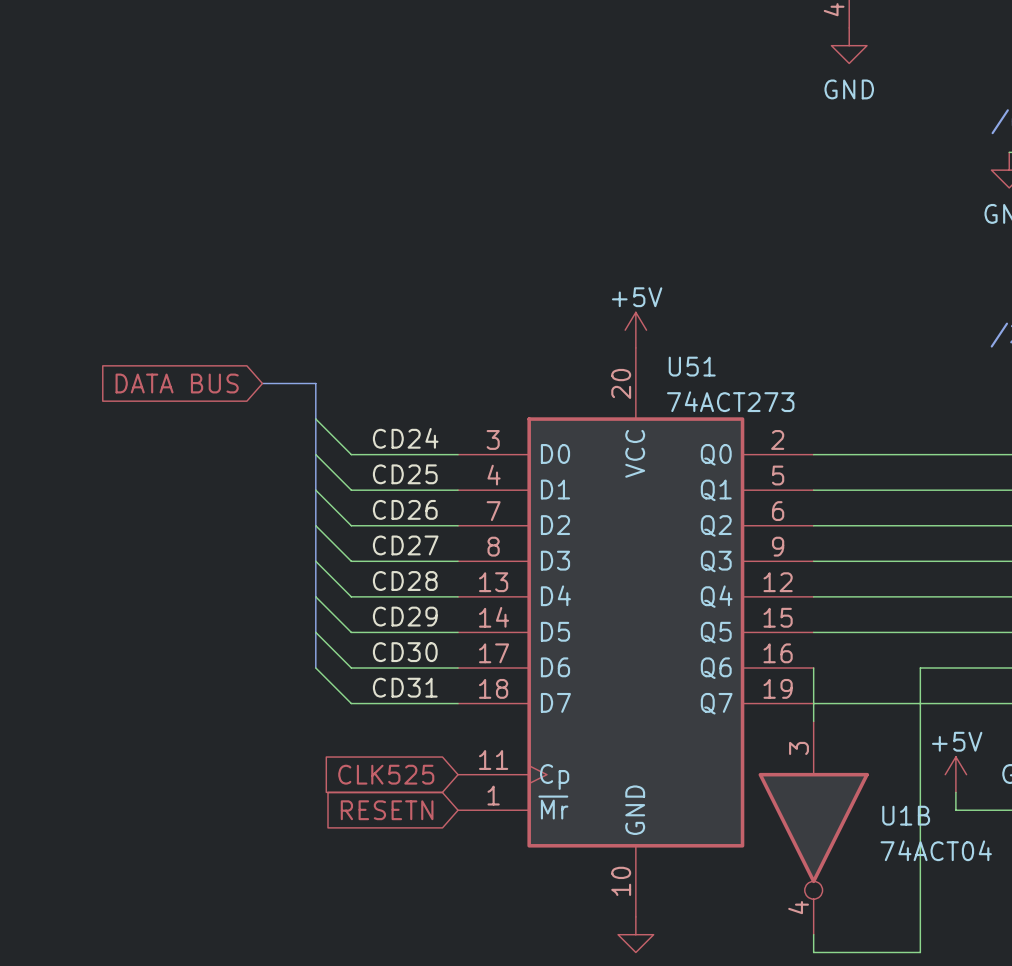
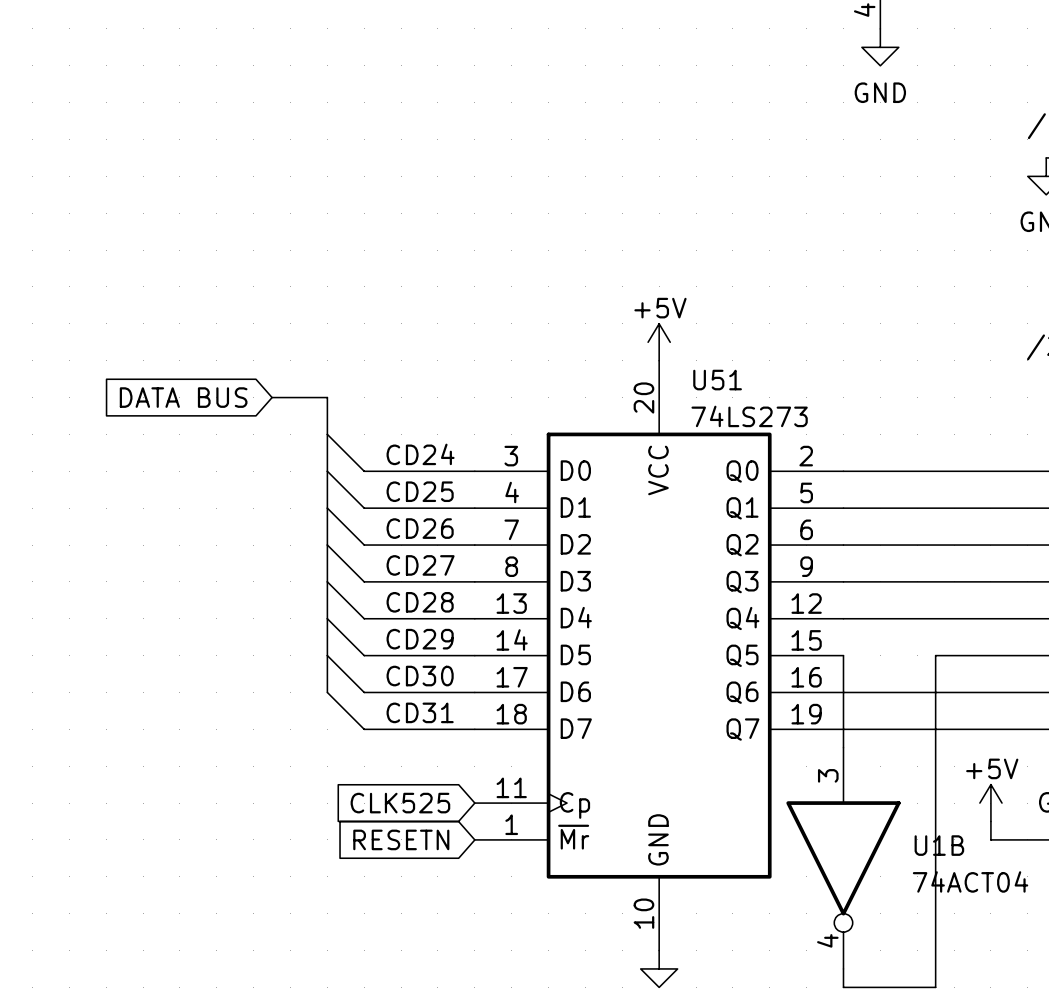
U51 value: 74ACT273 (730, 401) -> 74LS273 (749, 416)
wire: (813, 632) (902, 632) -> (843, 655) (843, 692) (954, 692)
wire: (920, 667) (920, 952) (902, 952) -> (935, 655) (935, 987)

